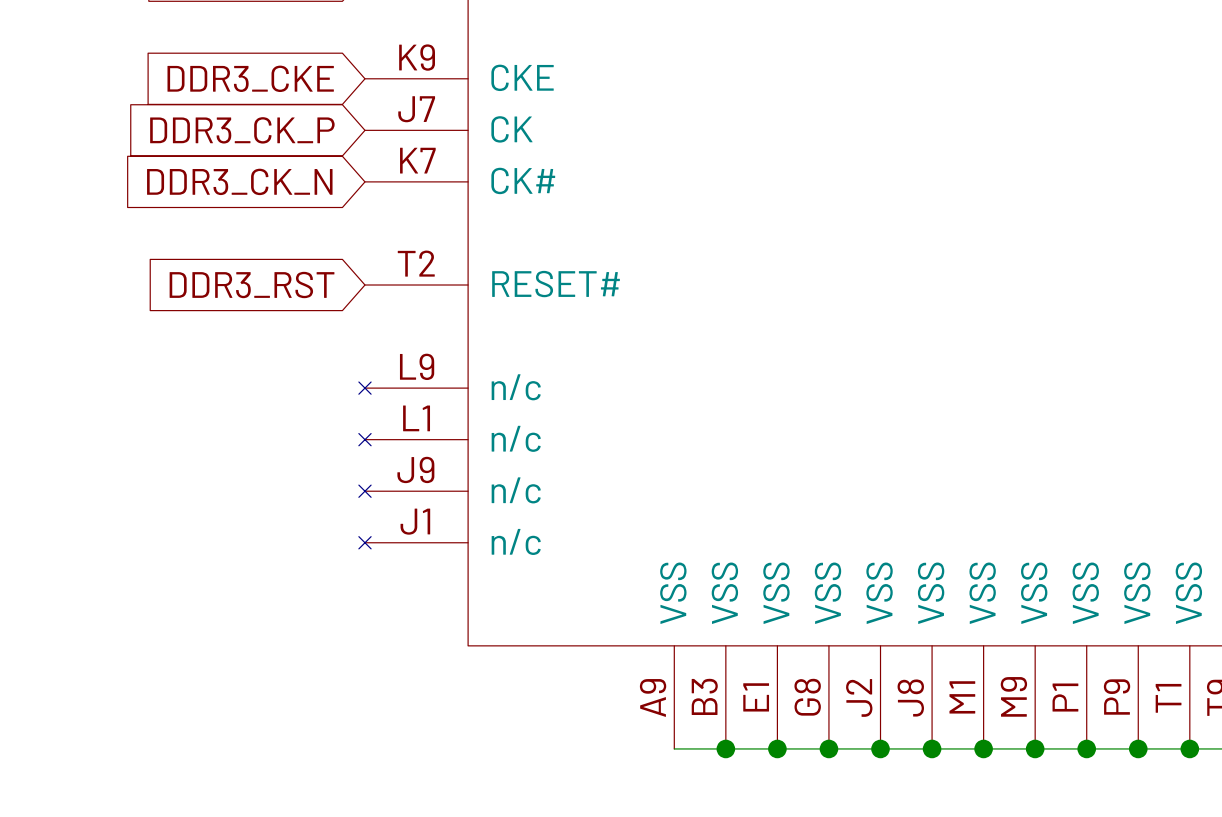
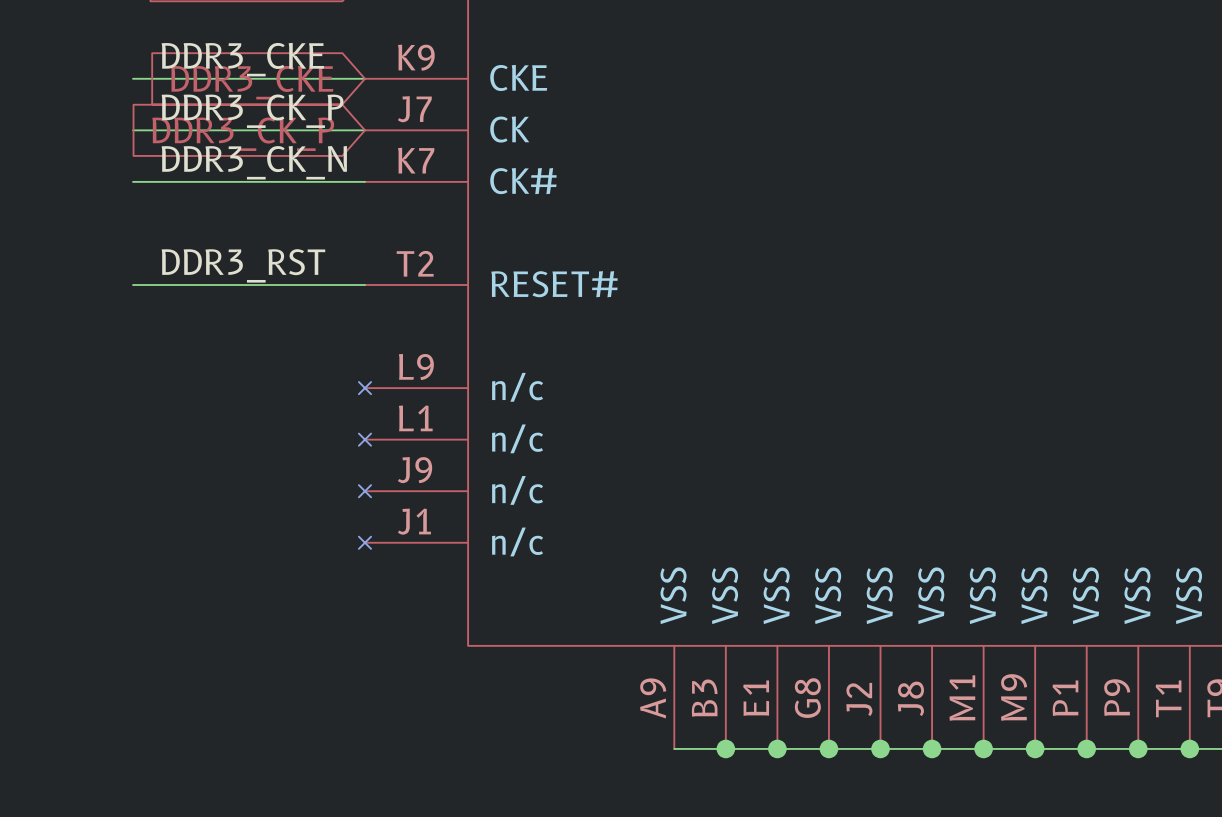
label: none -> DDR3_CKE (242, 59)
wire: none -> (133, 78) (364, 78)
label: none -> DDR3_CK_P (252, 111)
wire: none -> (133, 130) (364, 130)
label: none -> DDR3_CK_N (254, 162)
wire: none -> (133, 181) (364, 181)
global label: DDR3_CK_N (239, 181) -> none
label: none -> DDR3_RST (243, 265)
wire: none -> (133, 285) (364, 285)
global label: DDR3_RST (252, 285) -> none

